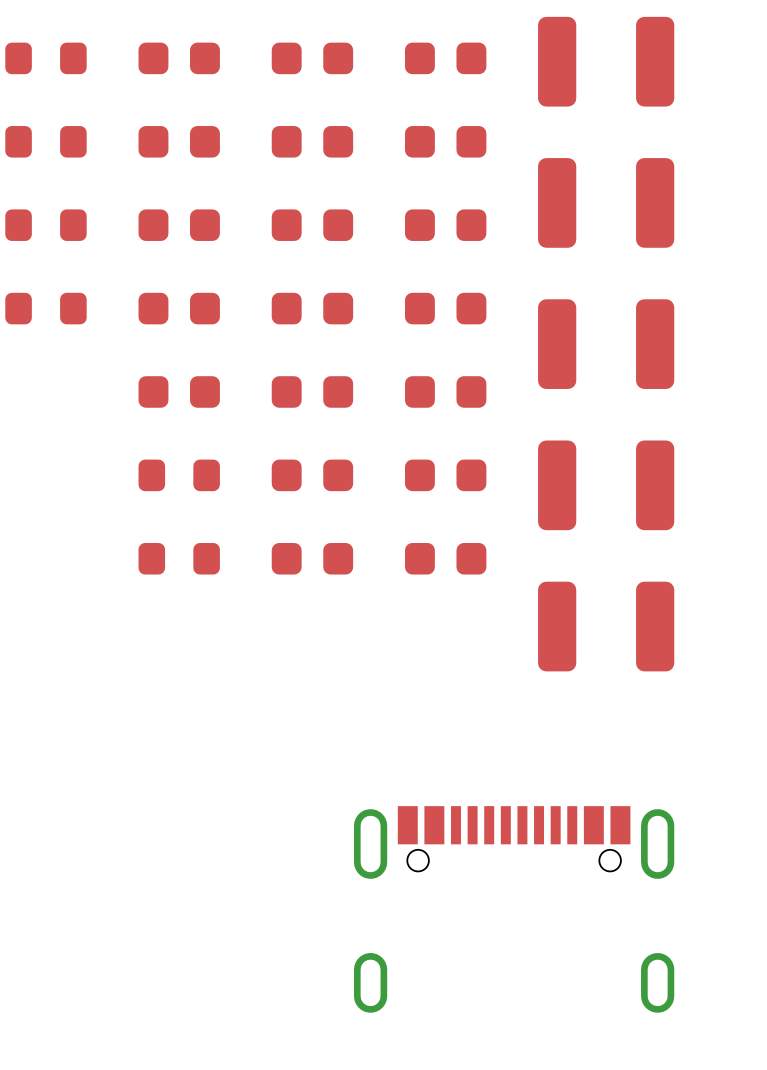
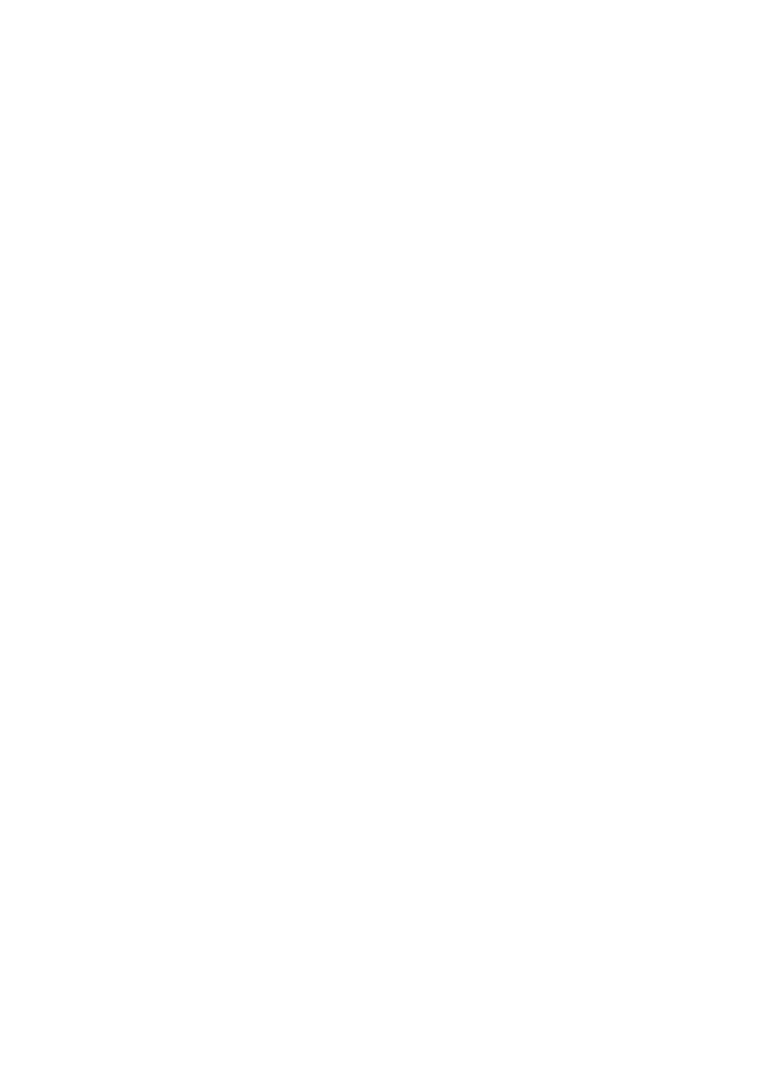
part: (45, 58) -> none
part: (179, 58) -> none
part: (312, 58) -> none
part: (445, 58) -> none
part: (606, 61) -> none
part: (45, 141) -> none
part: (179, 141) -> none
part: (312, 141) -> none
part: (445, 141) -> none
part: (606, 202) -> none
part: (45, 225) -> none
part: (179, 225) -> none
part: (312, 225) -> none
part: (445, 225) -> none
part: (45, 308) -> none
part: (179, 308) -> none
part: (312, 308) -> none
part: (445, 308) -> none
part: (606, 344) -> none
part: (179, 391) -> none
part: (312, 391) -> none
part: (445, 391) -> none
part: (179, 475) -> none
part: (312, 475) -> none
part: (445, 475) -> none
part: (606, 485) -> none
part: (179, 558) -> none
part: (312, 558) -> none
part: (445, 558) -> none
part: (606, 626) -> none
part: (514, 909) -> none

